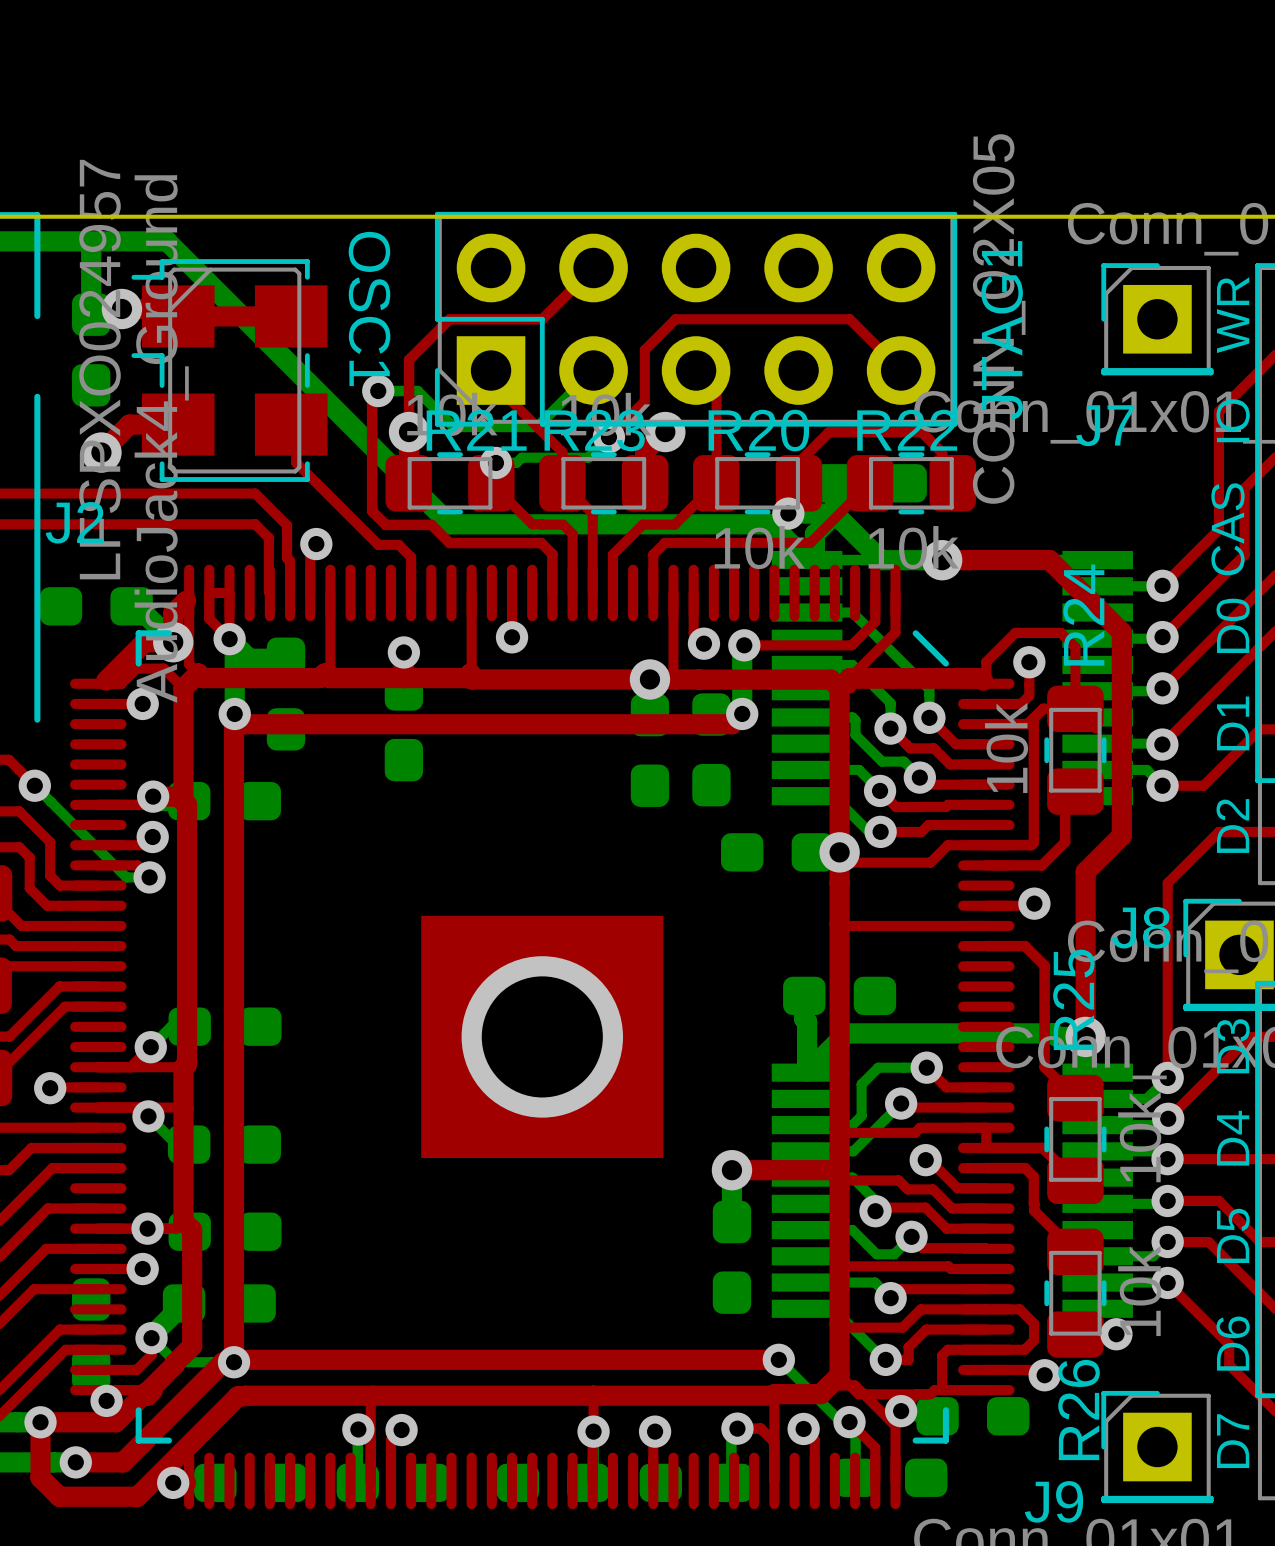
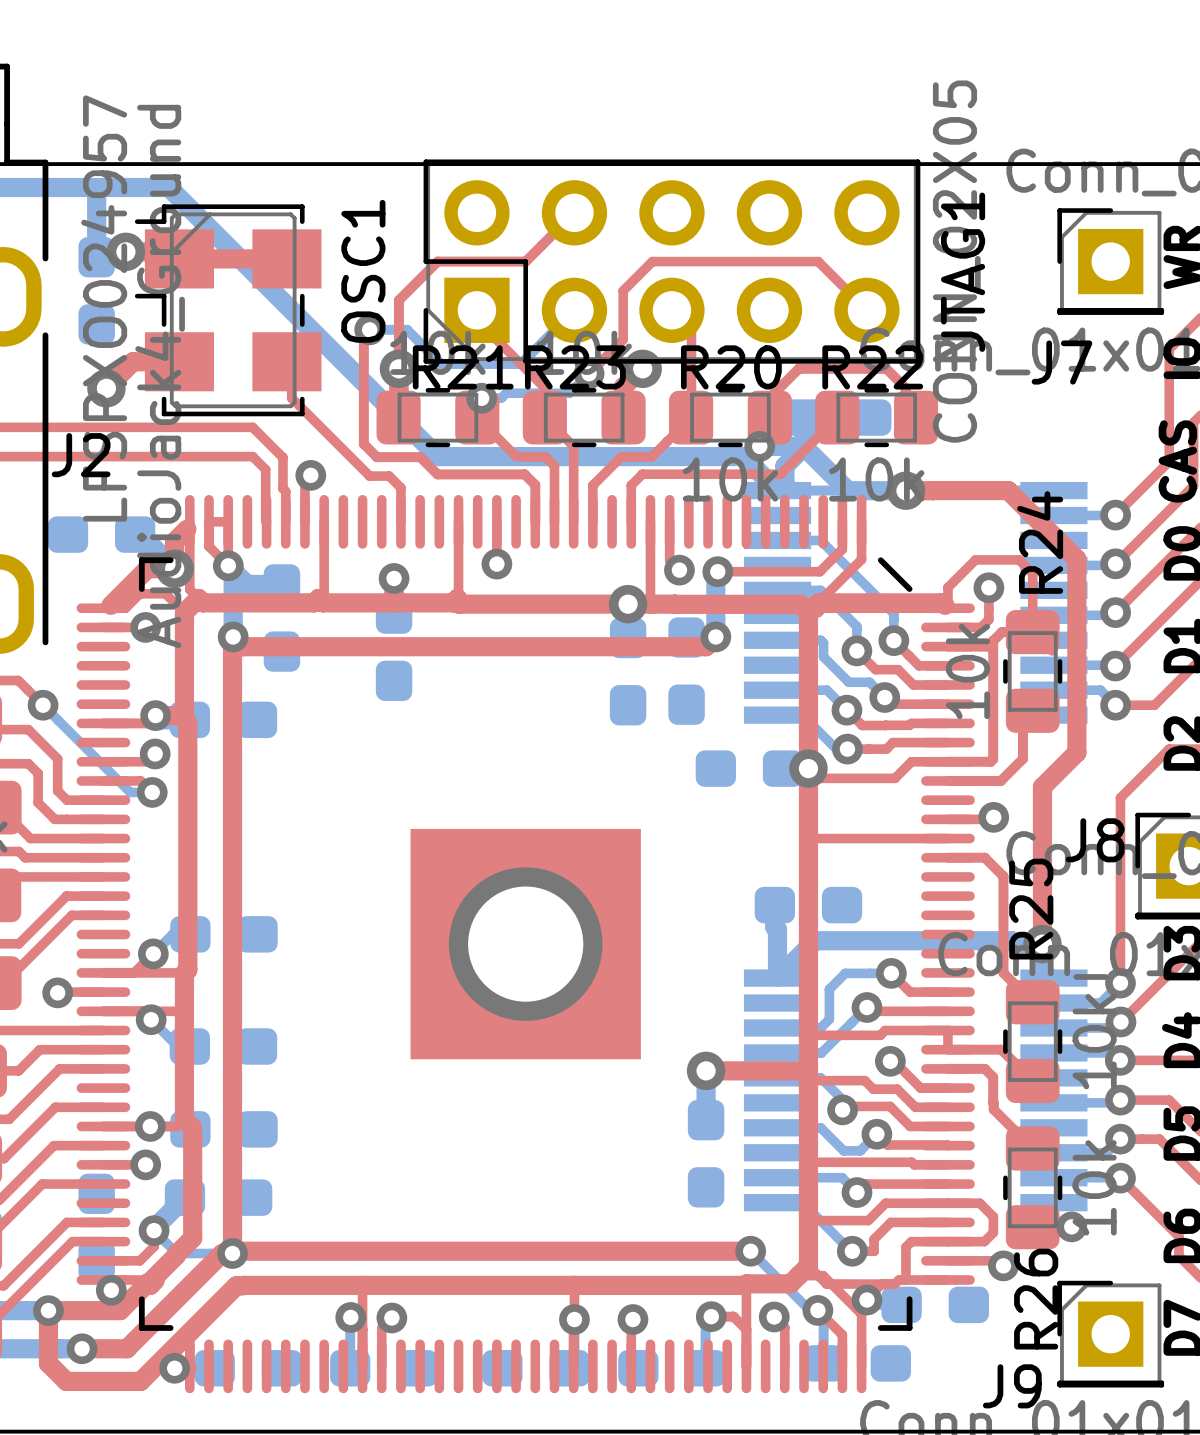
OSC1 name rotation: 0° (369, 308) -> 180° (363, 271)

